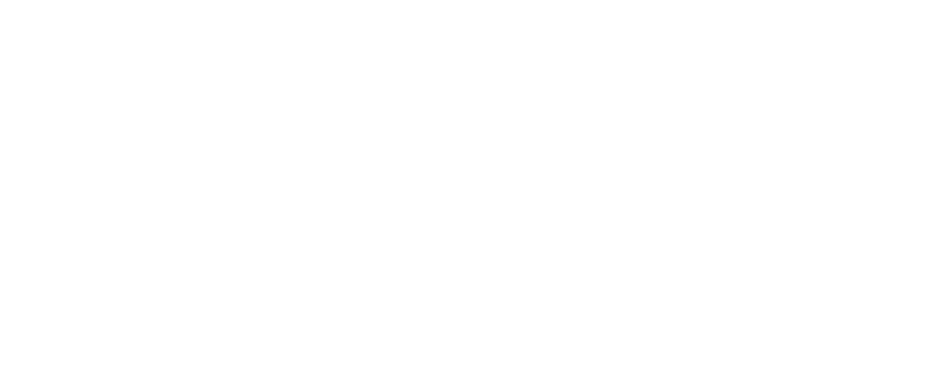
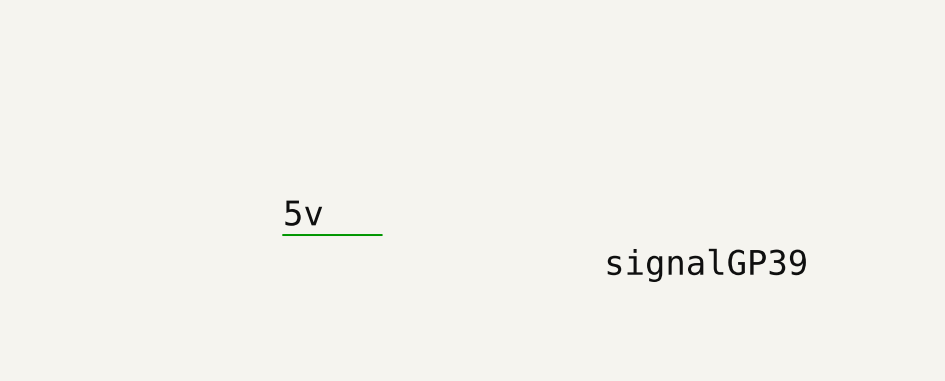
label: none -> 5v (303, 213)
wire: none -> (283, 235) (381, 235)
label: none -> signalGP39 (706, 265)

